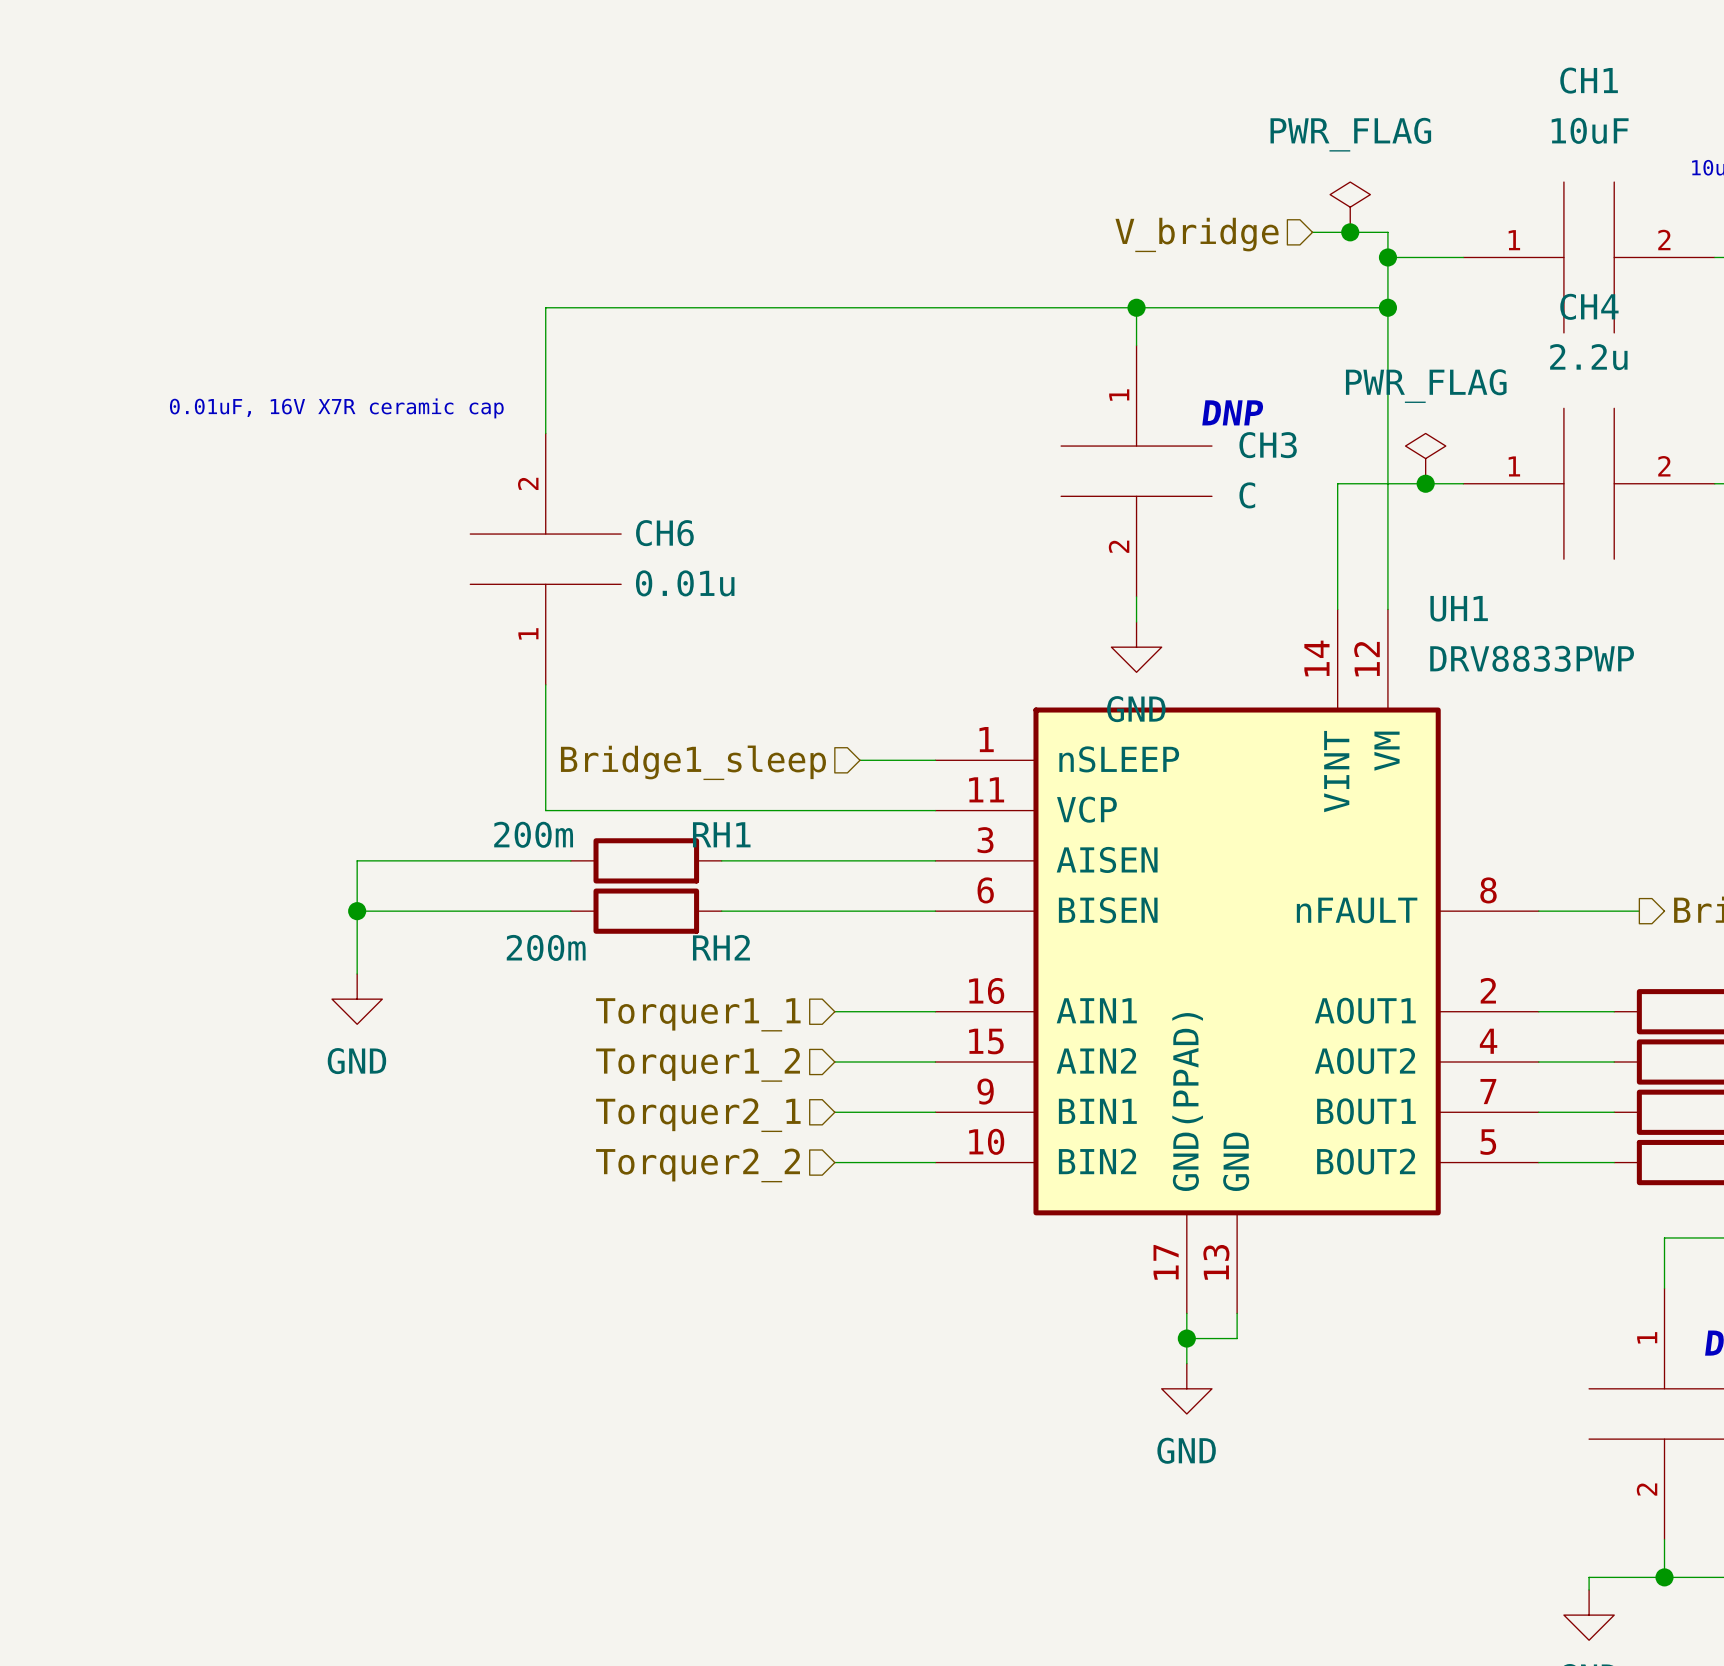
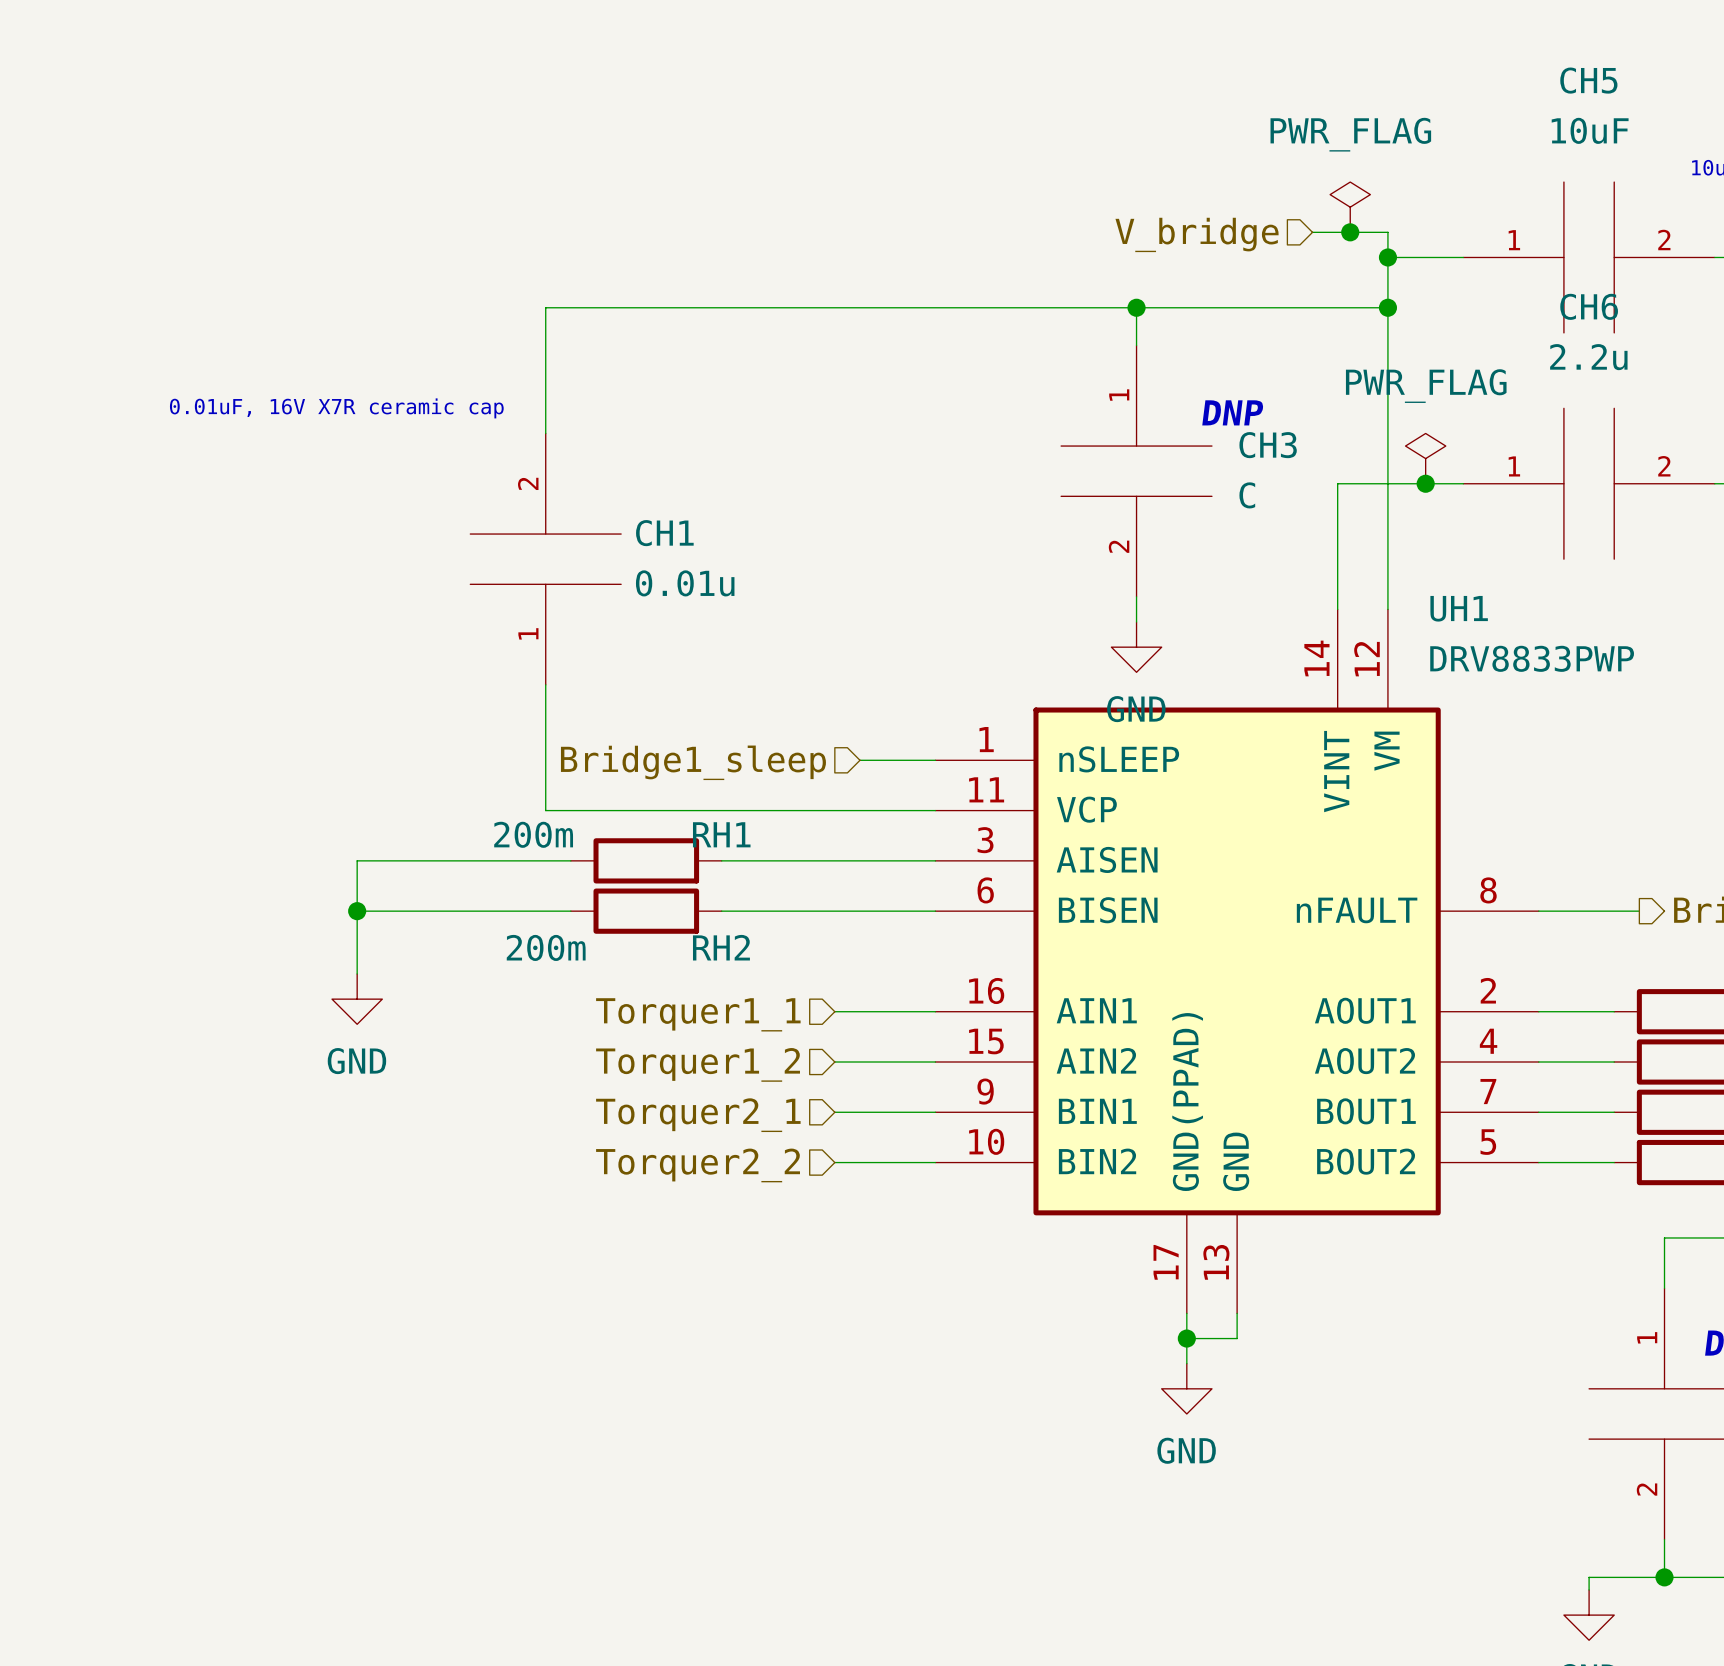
CH1 name: CH1 (1589, 80) -> CH5 (1588, 80)
CH4 name: CH4 (1589, 306) -> CH6 (1589, 306)
CH6 name: CH6 (664, 533) -> CH1 (664, 533)

